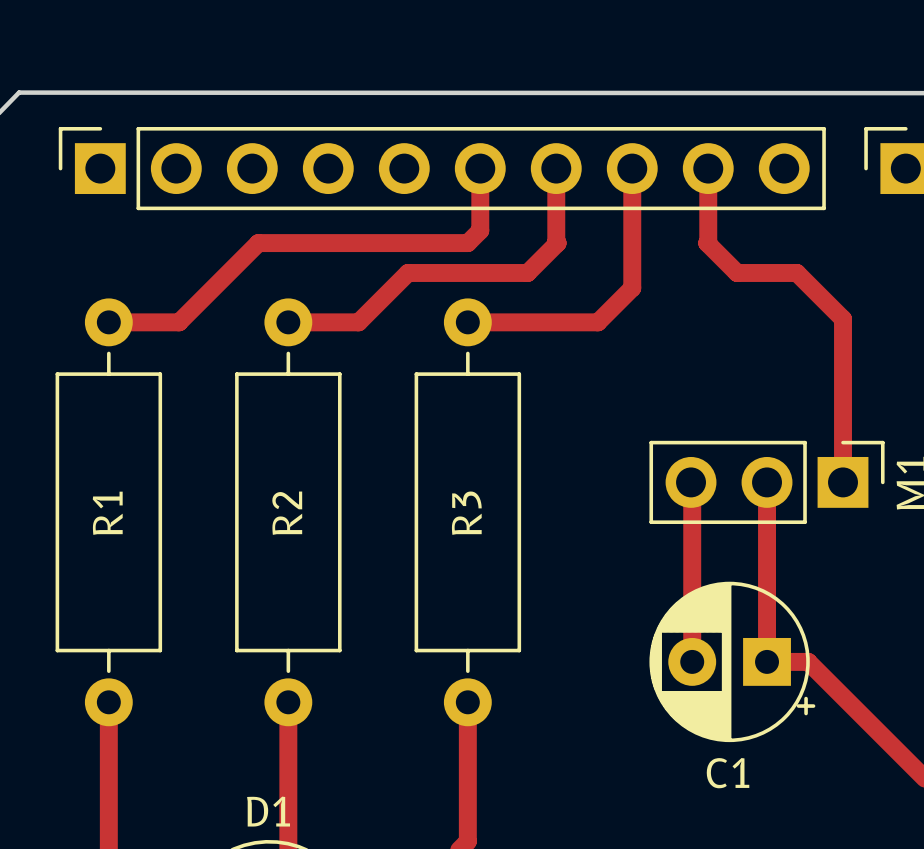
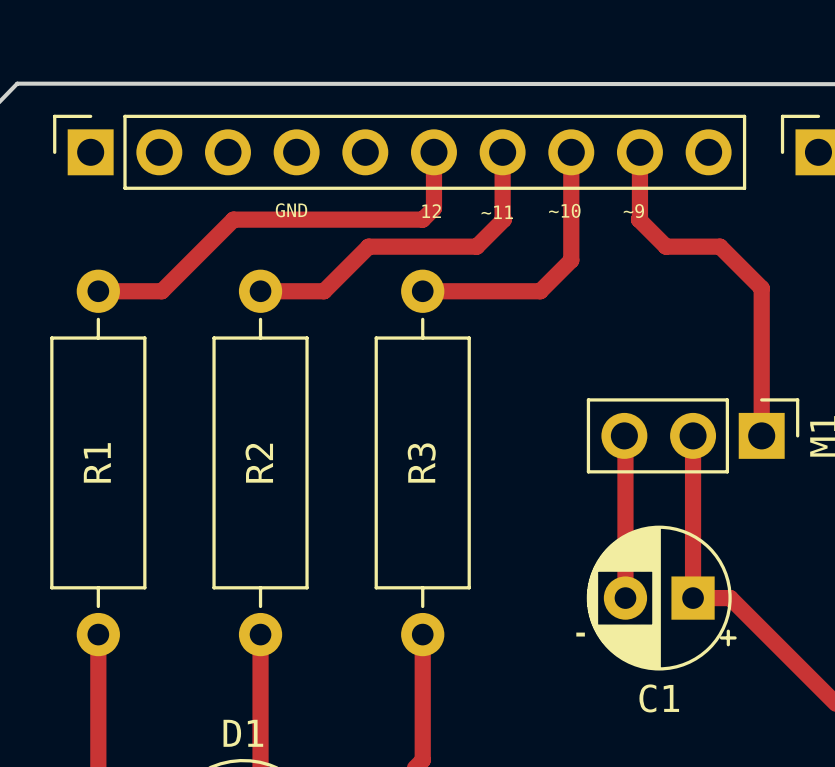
text: none -> GND (291, 210)
text: none -> 12 (431, 211)
text: none -> ~10 (564, 210)
text: none -> ~9 (633, 211)
text: none -> ~11 (497, 212)
text: none -> - (580, 634)

